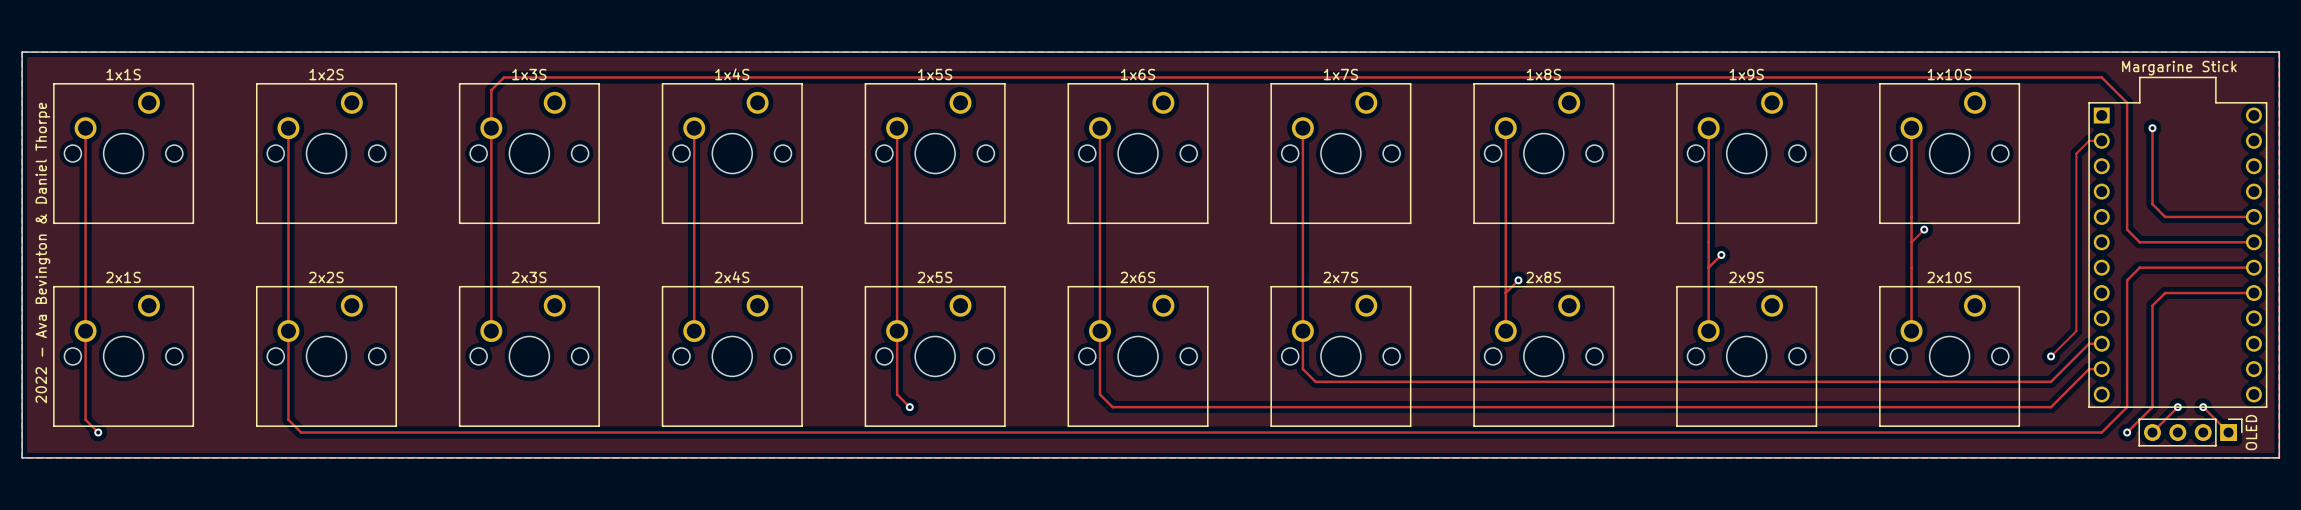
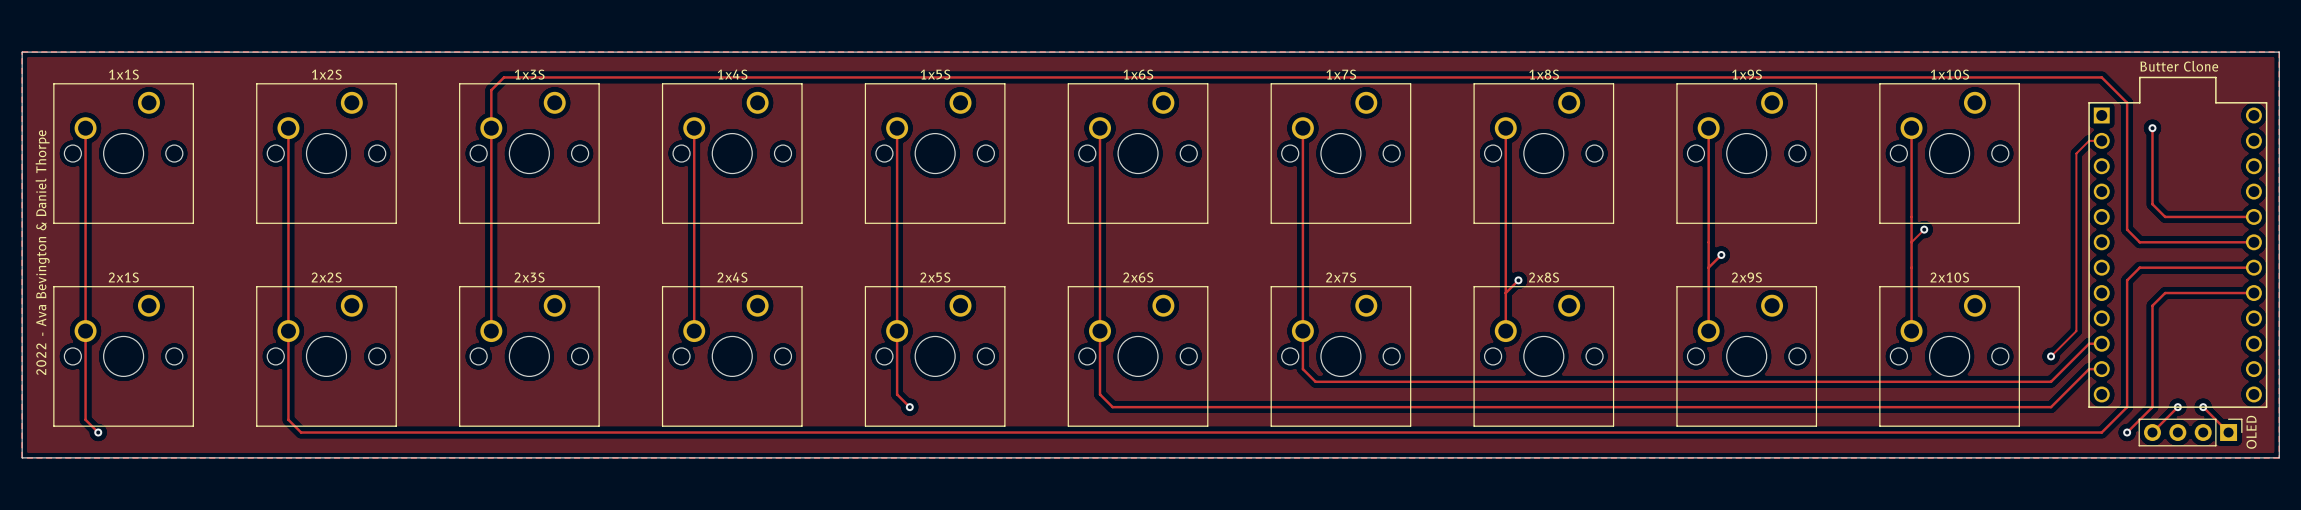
text: Margarine Stick (2179, 68) -> Butter Clone (2179, 66)

